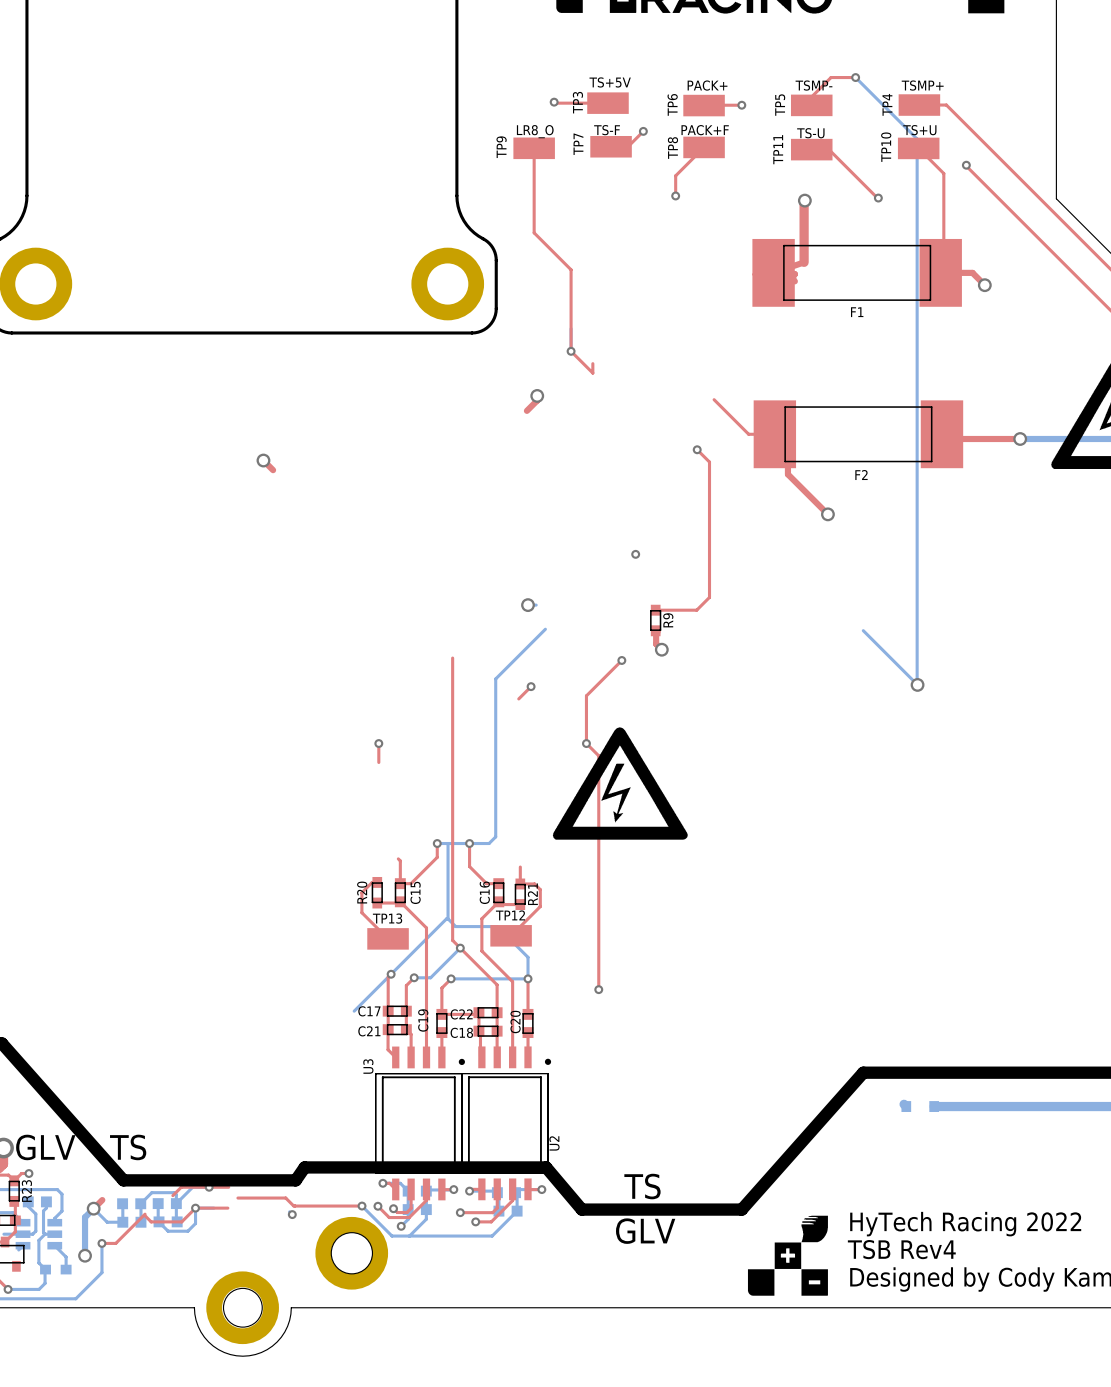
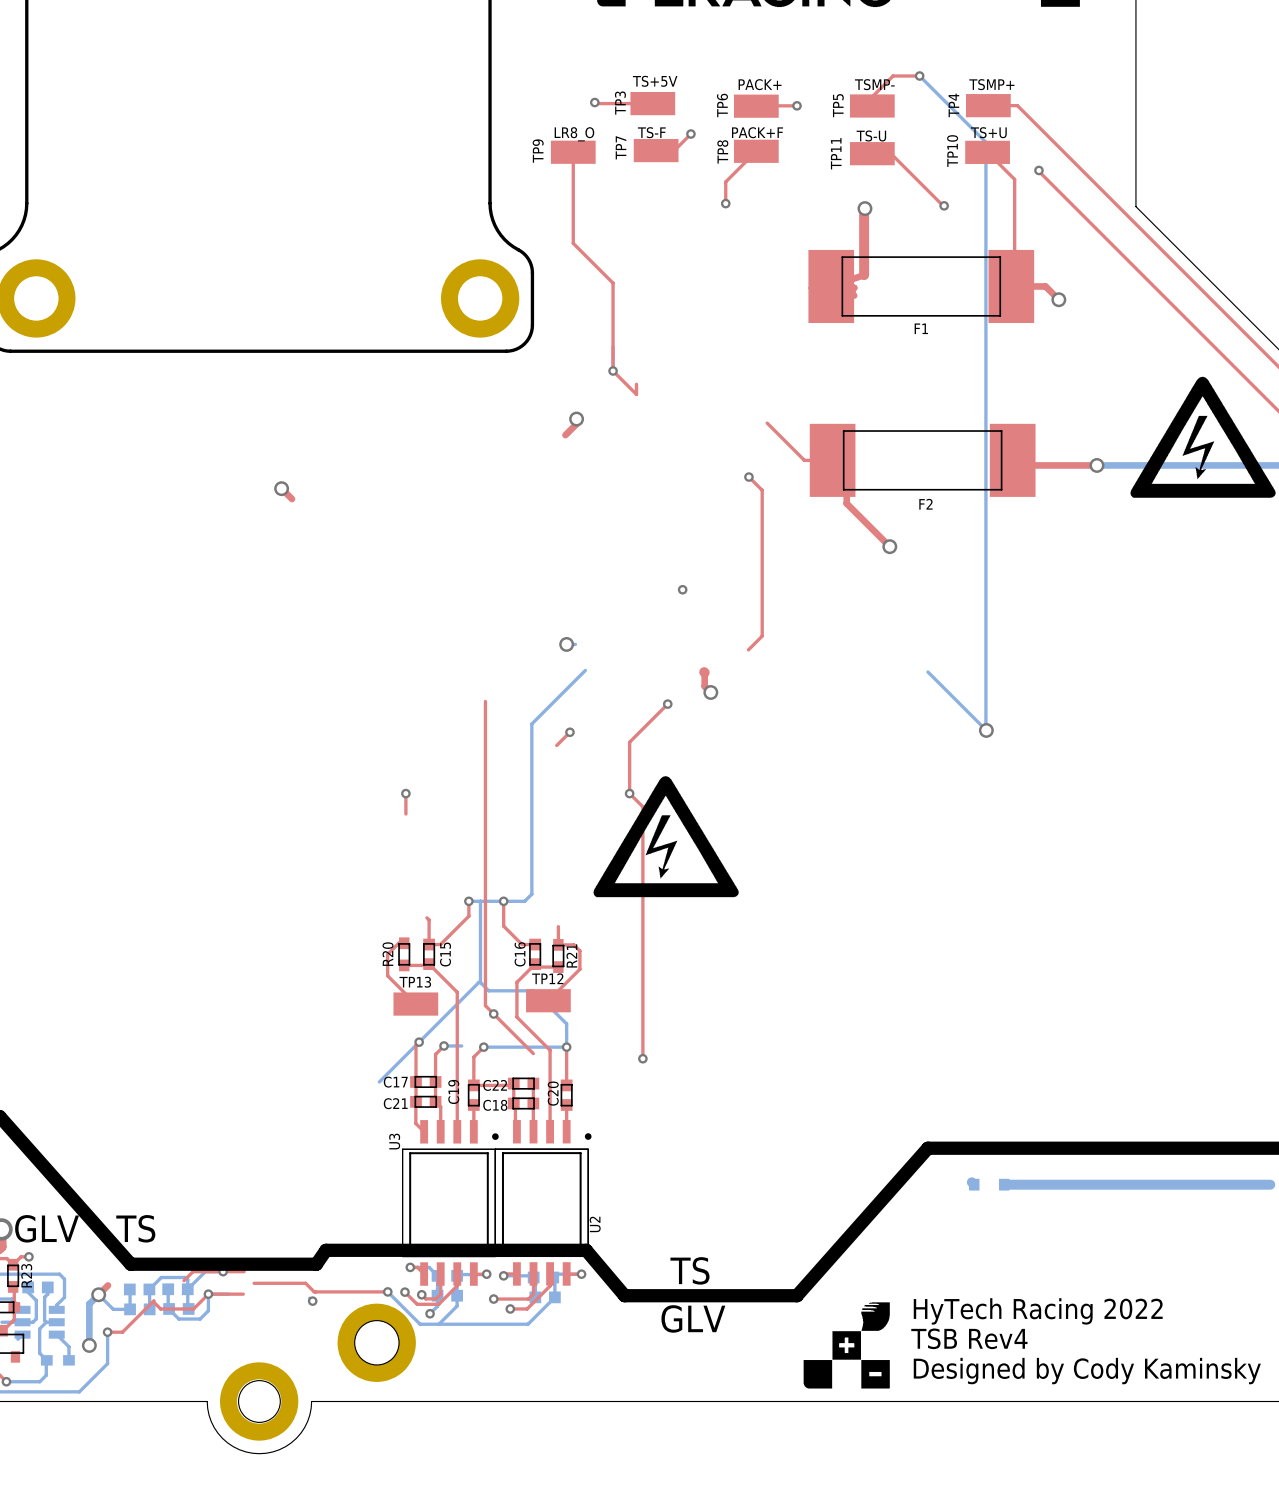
top track: (655, 610) (696, 610) -> none
R9: (655, 620) -> none
bottom track: (460, 948) (430, 977) -> none
top track: (497, 984) (497, 1012) -> none

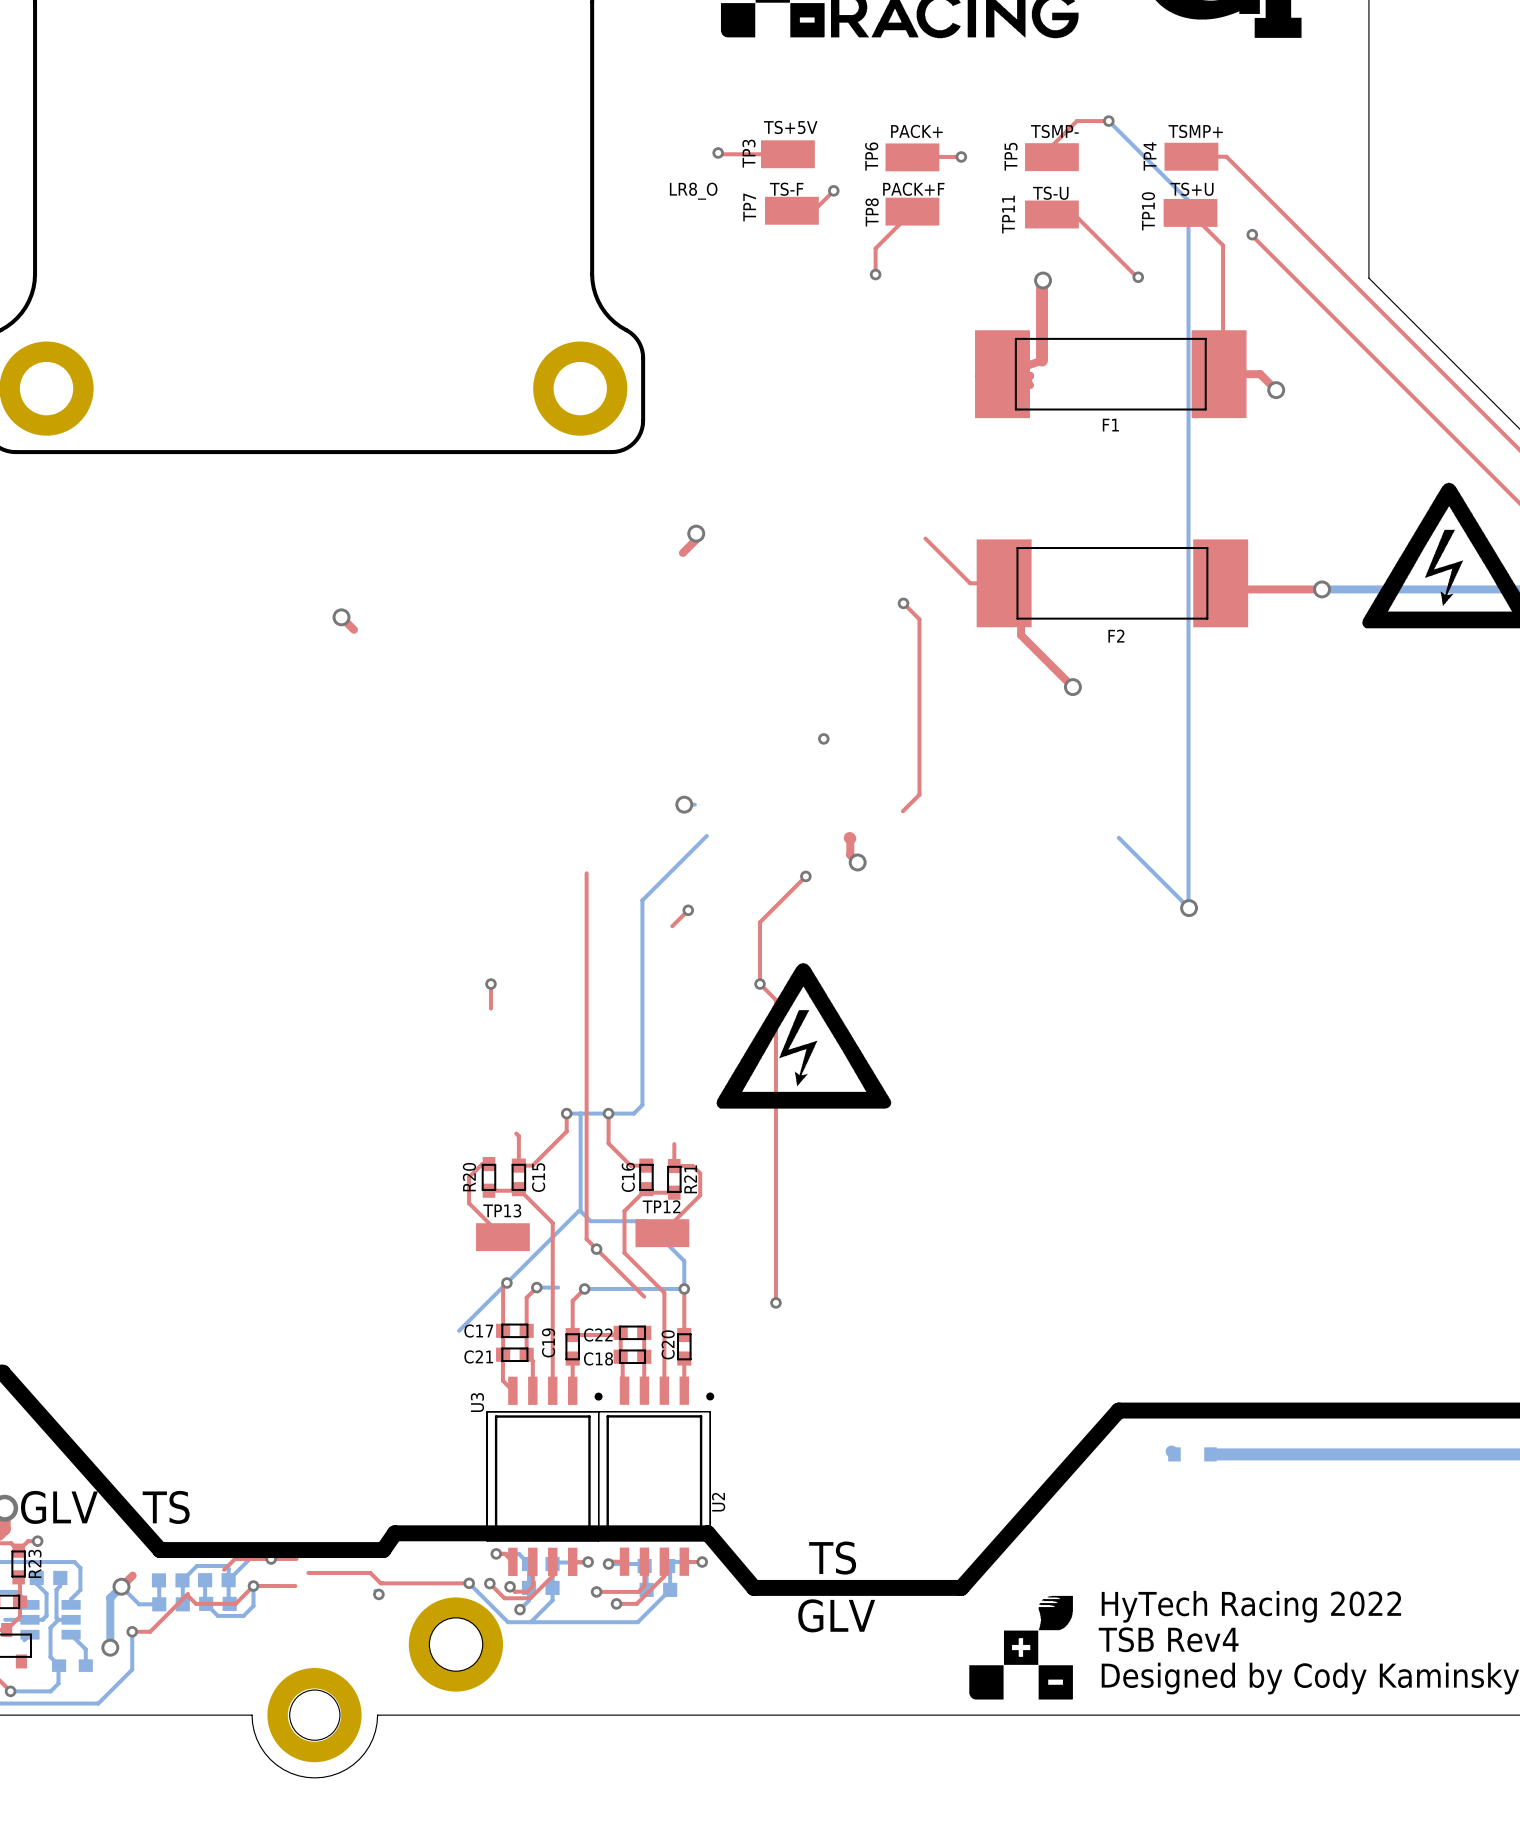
top track: (573, 152) (573, 243) (613, 283) (613, 370) (636, 394) (636, 384) -> none
TP9: (573, 152) -> none
via: (613, 370) -> none

